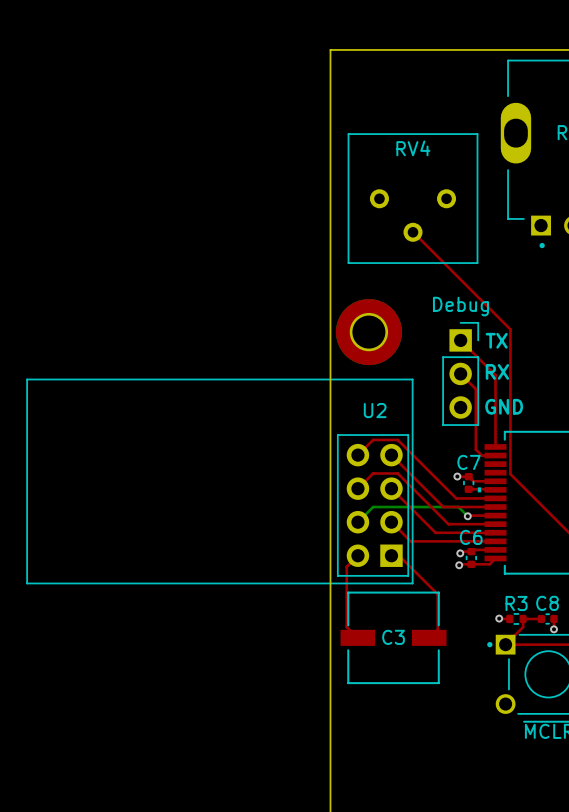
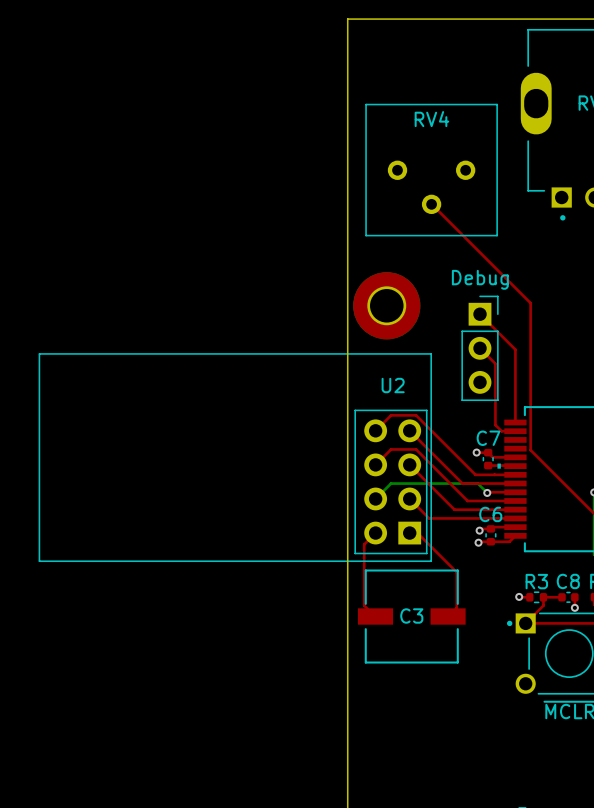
text: TX (496, 340) -> none
text: RX (497, 371) -> none
text: GND (504, 406) -> none

